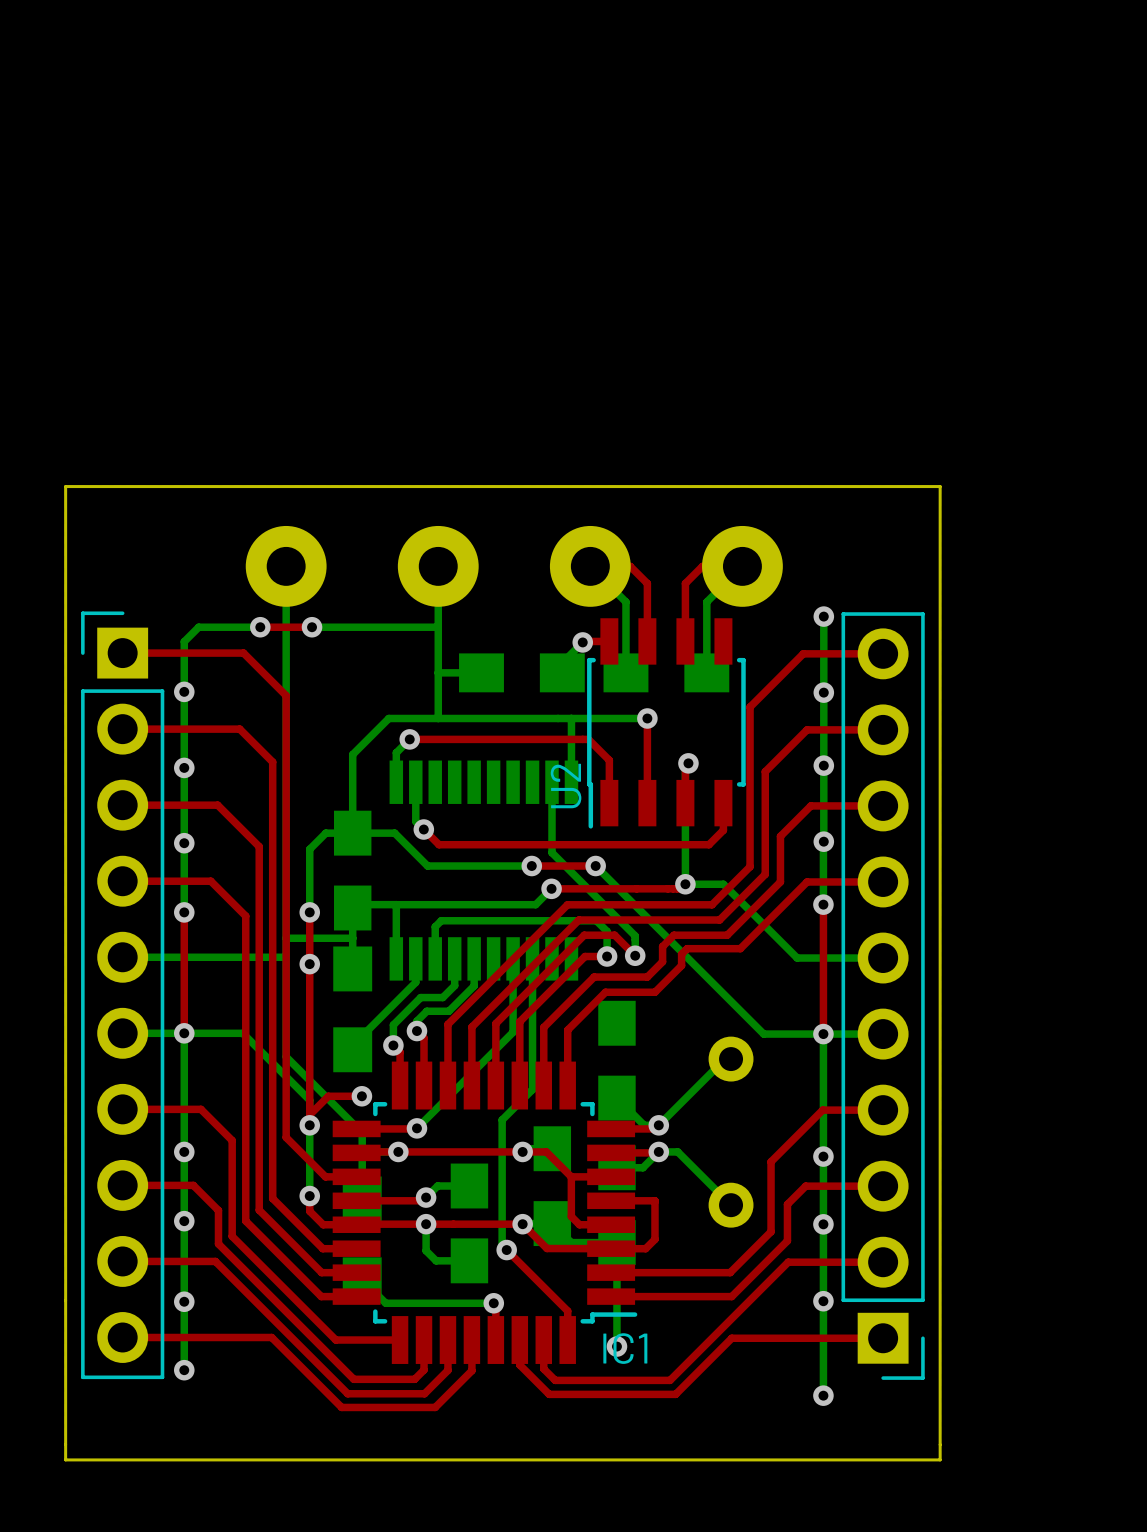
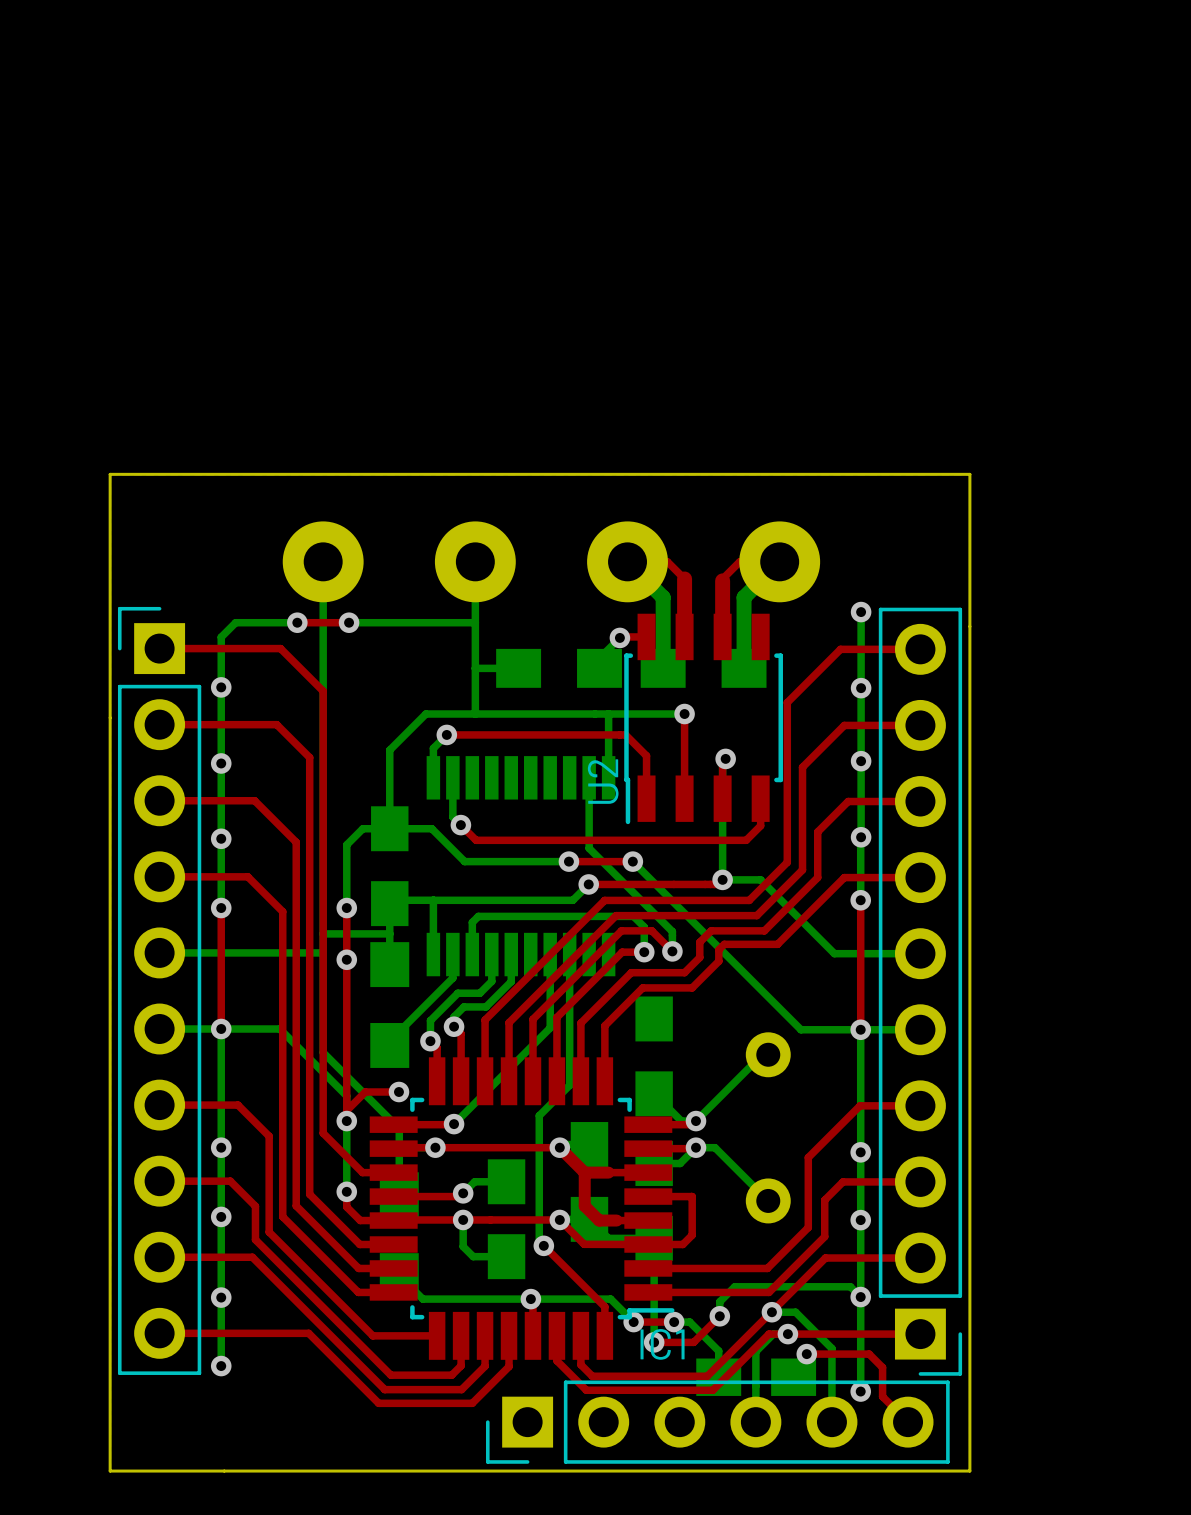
board edge: (65, 486) (65, 1459) (940, 1459) (940, 486) (65, 486) -> (110, 474) (110, 1471) (969, 1471) (969, 474) (110, 474)
bottom track width: thin (590, 566) (625, 602) (625, 672) -> thick (627, 561) (663, 597) (663, 668)
bottom track width: thin (742, 566) (706, 602) (706, 672) -> thick (779, 561) (744, 597) (744, 668)
top track width: thin (647, 583) (647, 641) -> thick (684, 578) (684, 636)
top track width: thin (685, 585) (685, 641) -> thick (722, 580) (722, 636)
top track: (522, 1151) (546, 1151) (571, 1176) (571, 1216) (579, 1224) -> (584, 1172) (584, 1206) (599, 1220) (616, 1220)
top track: none -> (559, 1147) (584, 1172)
top track: none -> (584, 1172) (608, 1172)
bottom track: none -> (860, 1297) (850, 1286) (734, 1286) (719, 1301) (719, 1316)
bottom track: none -> (530, 1299) (610, 1299) (633, 1322)
bottom track: none -> (771, 1312) (795, 1312) (831, 1348) (831, 1422)
via: none -> (771, 1312)
top track: none -> (719, 1316) (693, 1342) (654, 1342)
via: none -> (719, 1316)
top track: none -> (633, 1322) (674, 1322)
via: none -> (633, 1322)
bottom track: none -> (674, 1322) (689, 1322) (718, 1351) (718, 1377)
via: none -> (674, 1322)
bottom track: none -> (787, 1334) (773, 1334) (755, 1351) (755, 1422)
via: none -> (787, 1334)
top track: none -> (806, 1354) (869, 1354) (882, 1367) (882, 1396) (908, 1422)
via: none -> (806, 1354)
part: none -> (756, 1377)
part: none -> (717, 1422)

